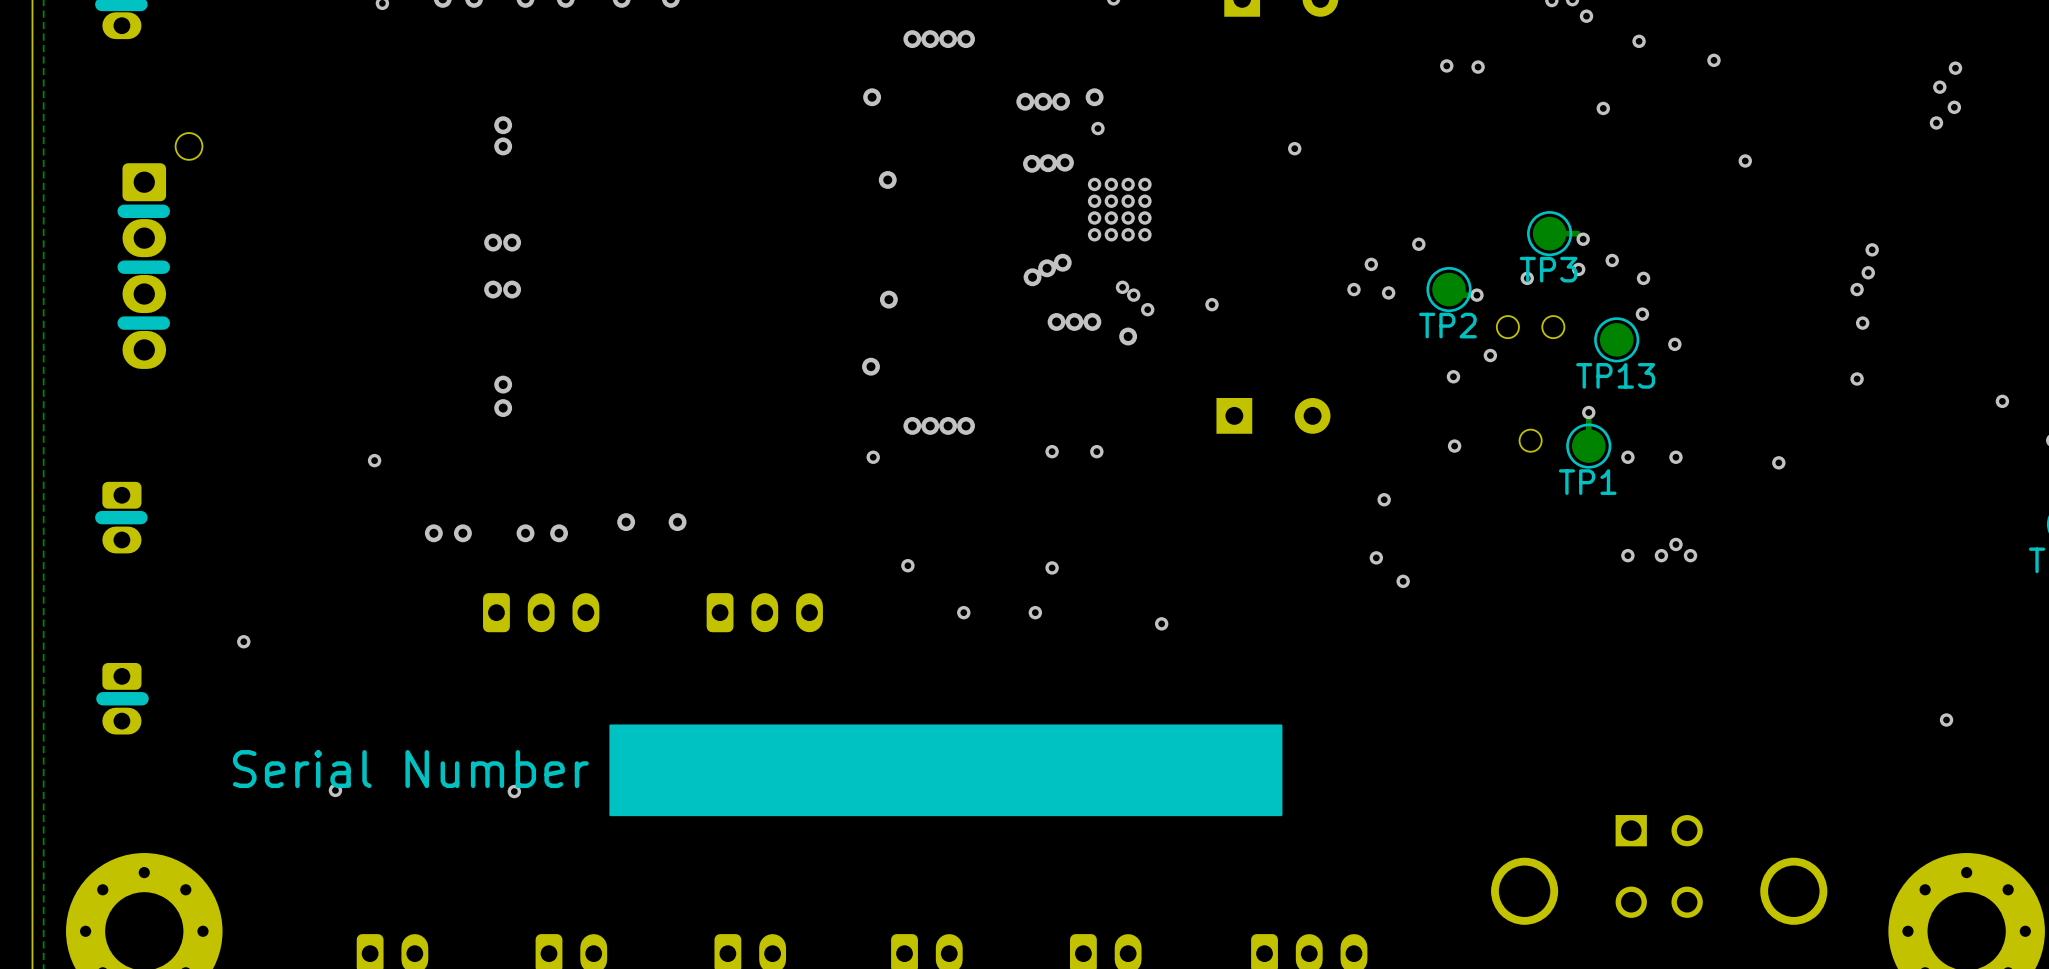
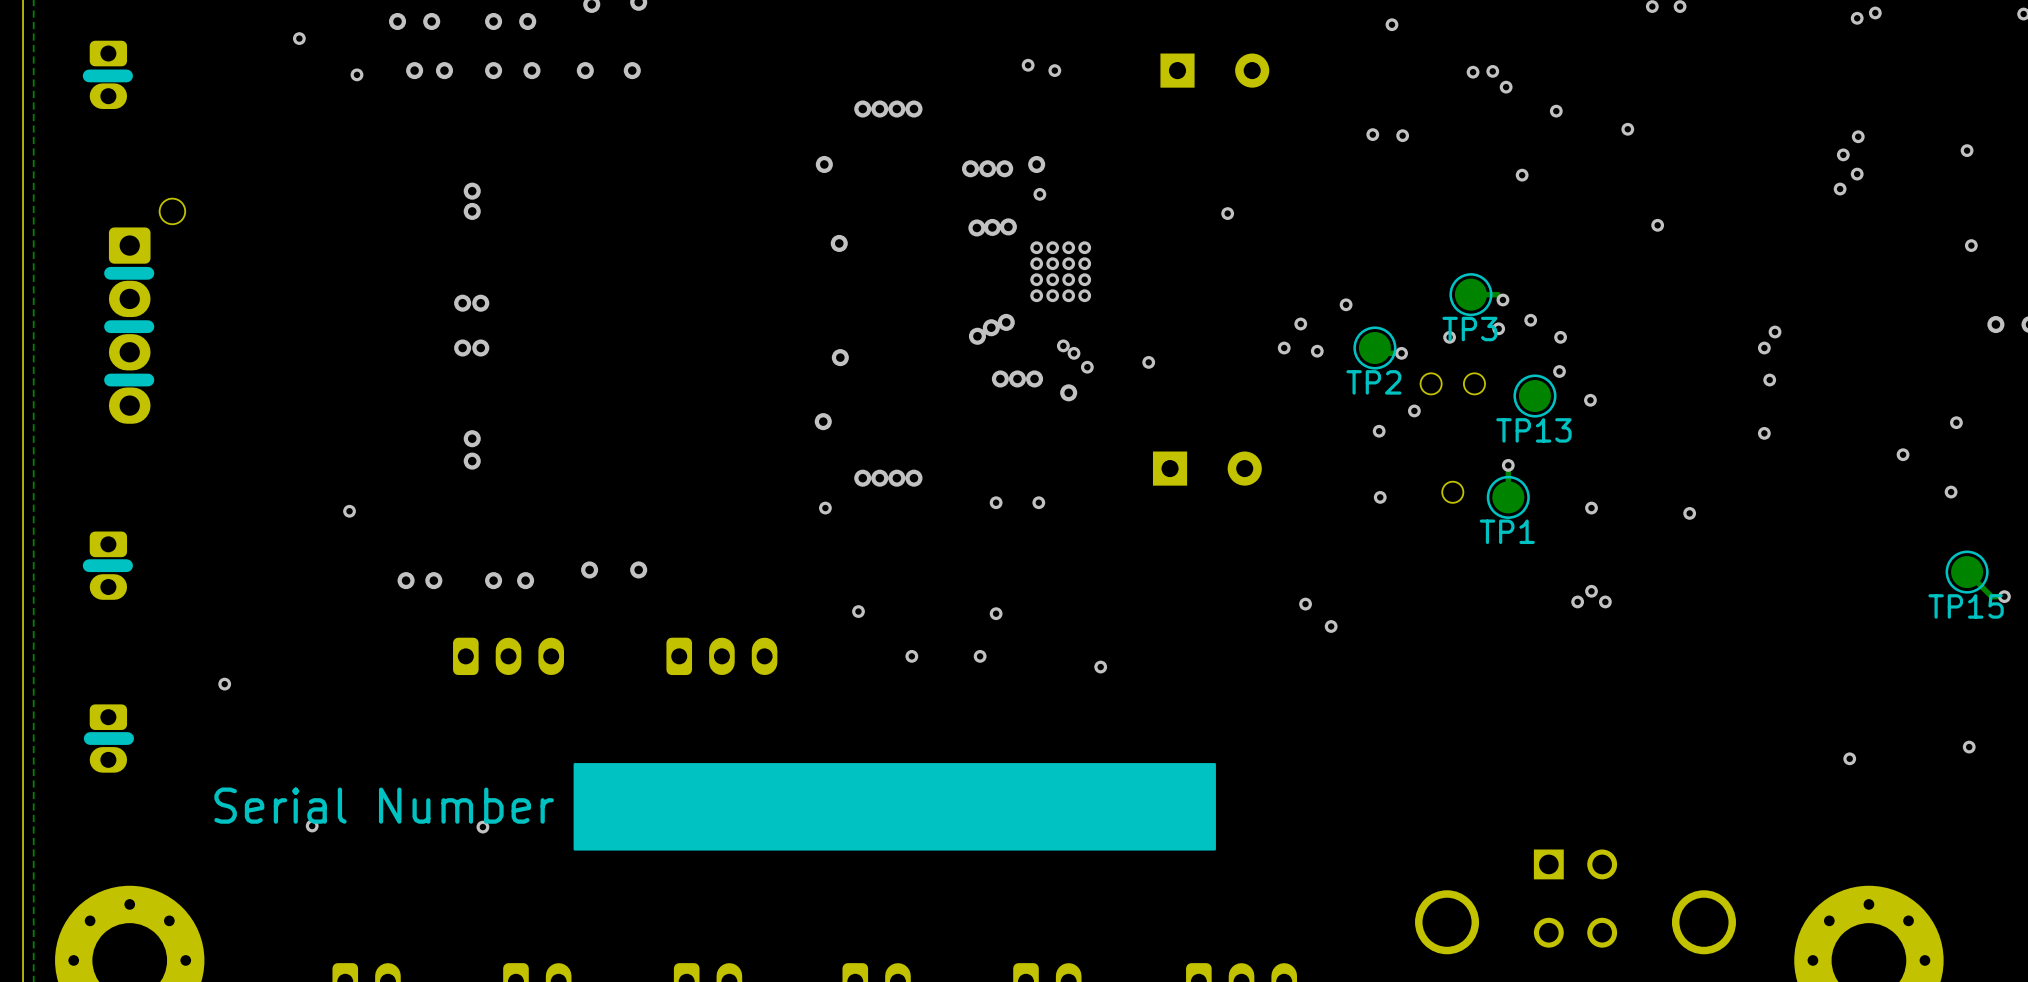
via: (1872, 249) -> none
via: (1627, 457) -> none
via: (1384, 499) -> none
via: (1627, 555) -> none

